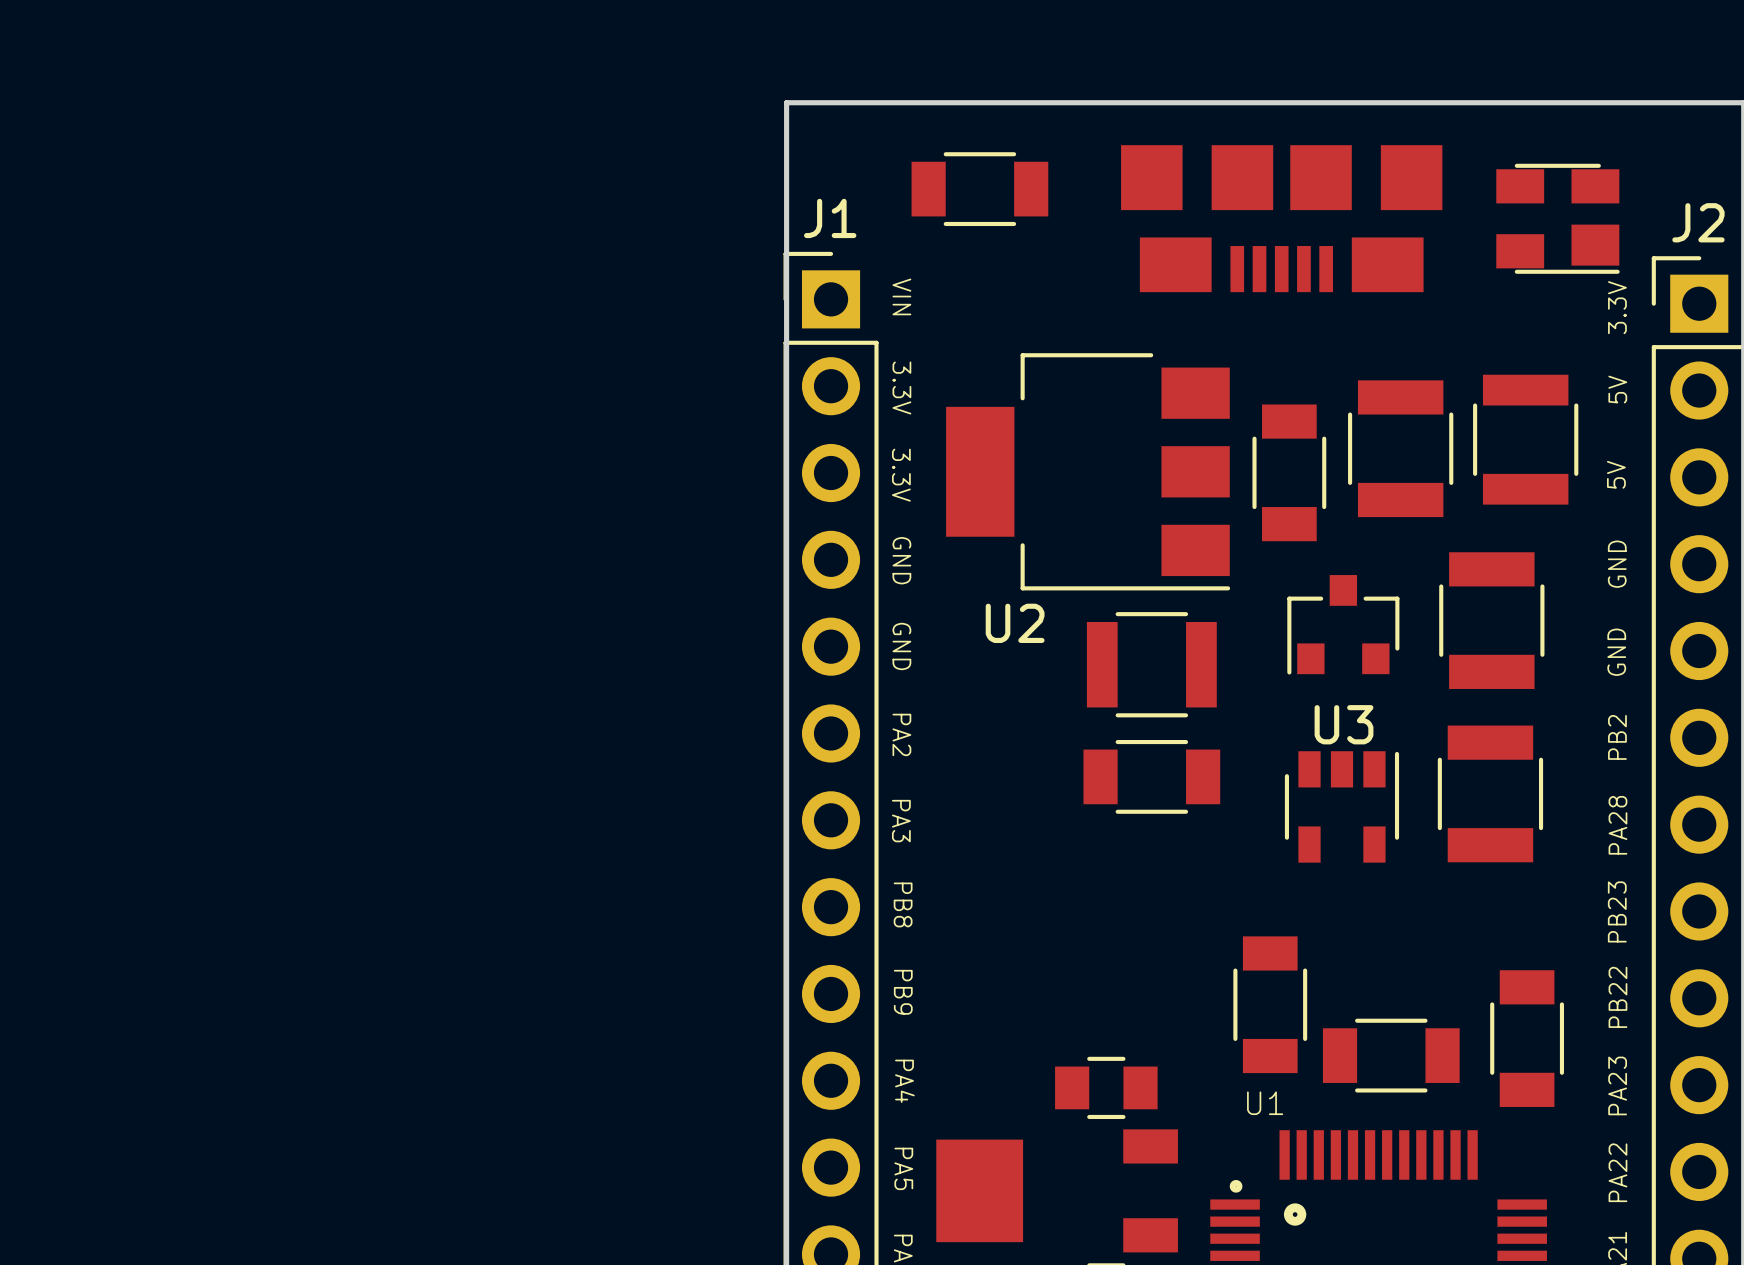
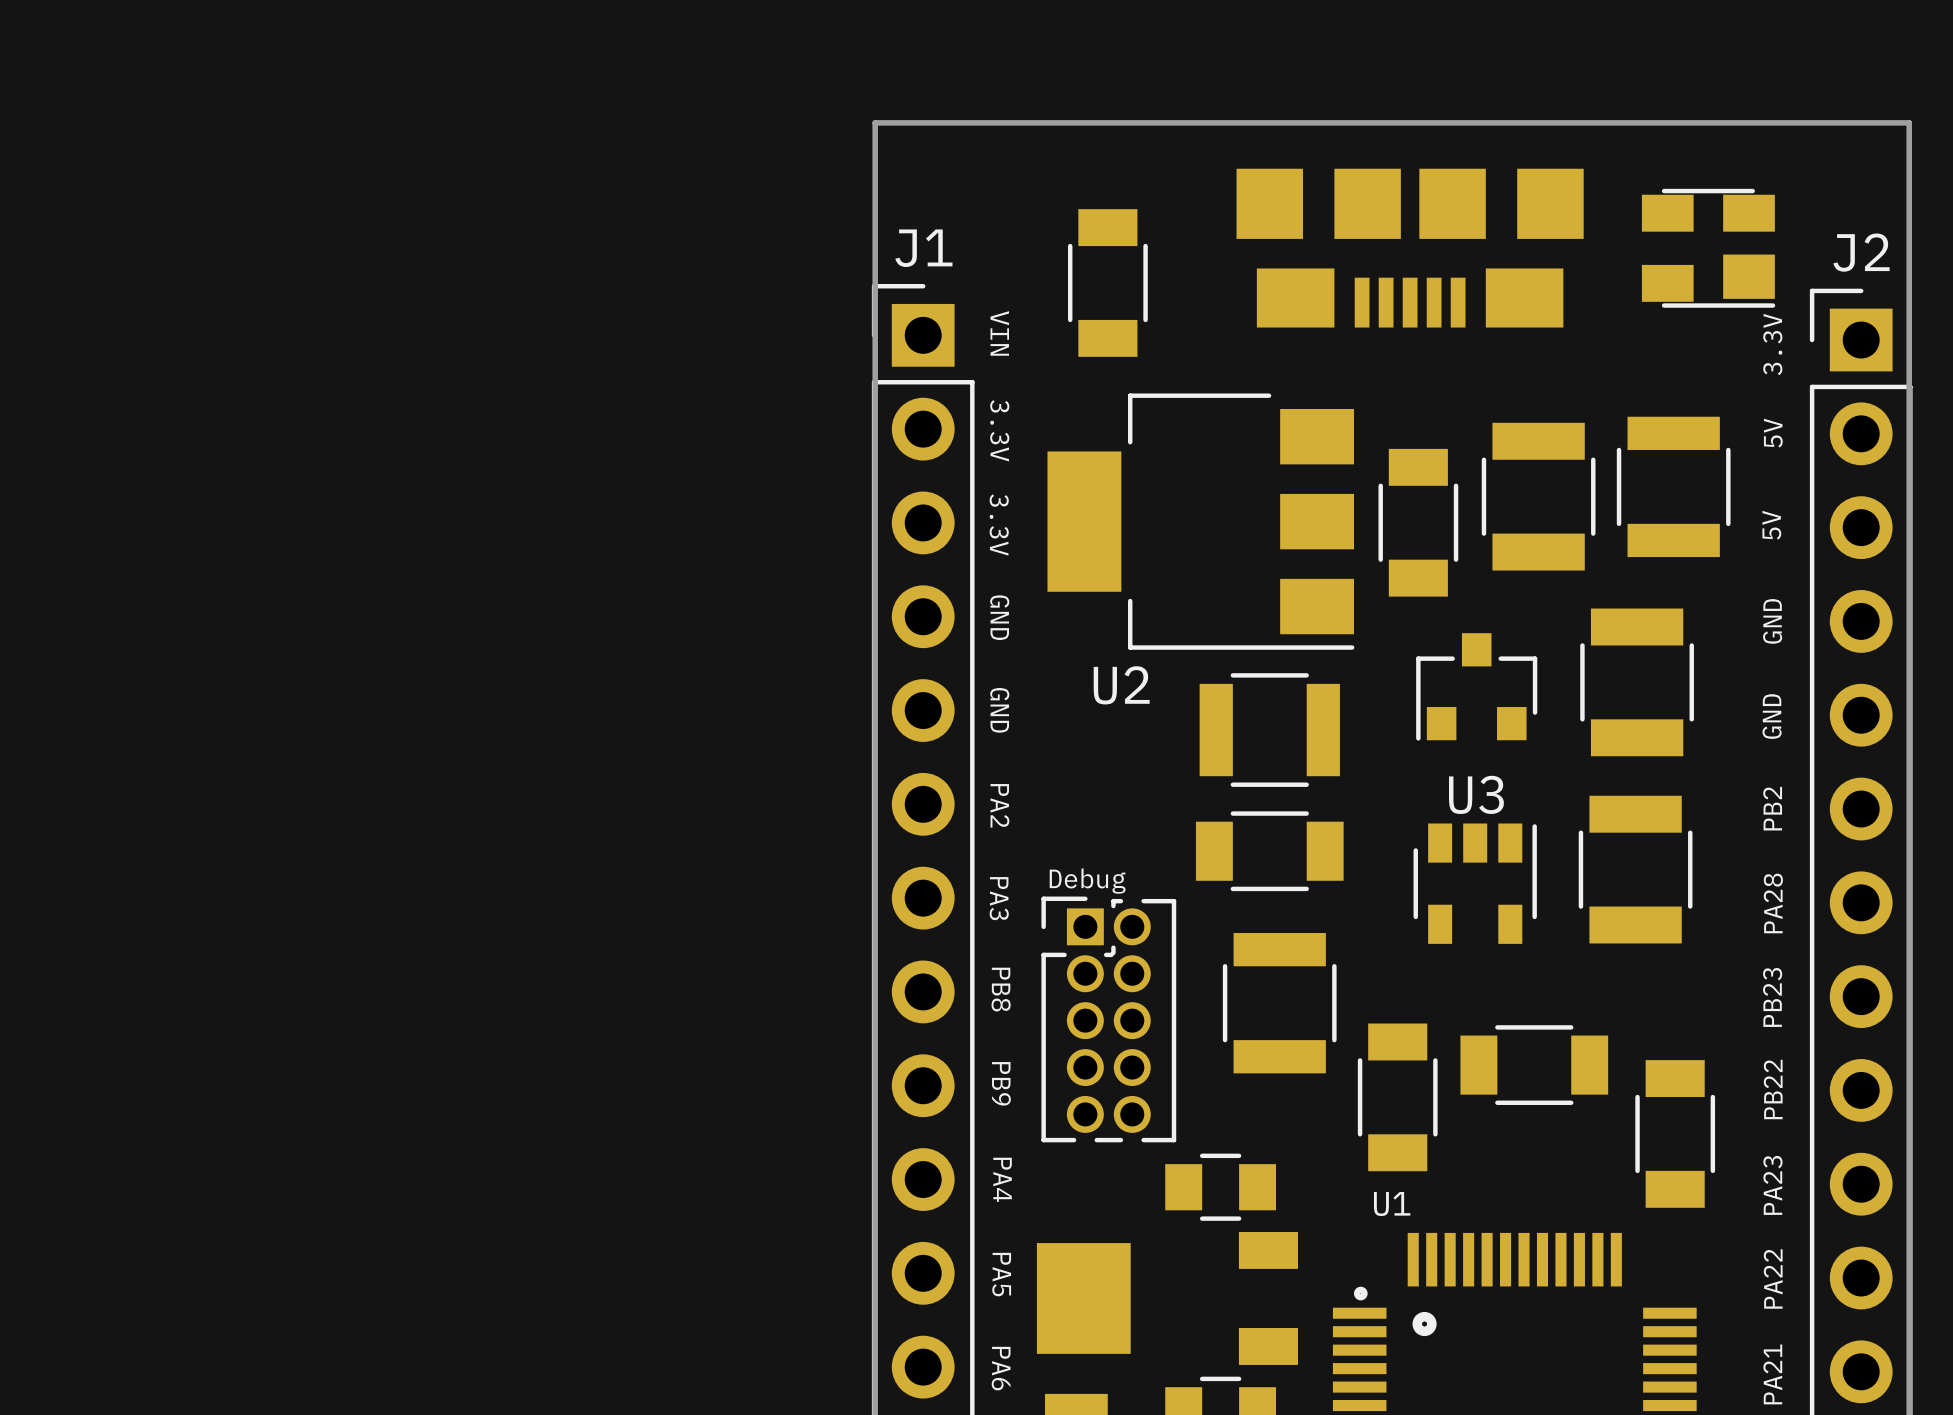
part rotation: 0° (979, 189) -> 90° clockwise (1107, 283)
text: none -> Debug (1087, 881)
part: none -> (1279, 1003)
part: none -> (1108, 1019)
part position: (1391, 1055) -> (1534, 1065)

